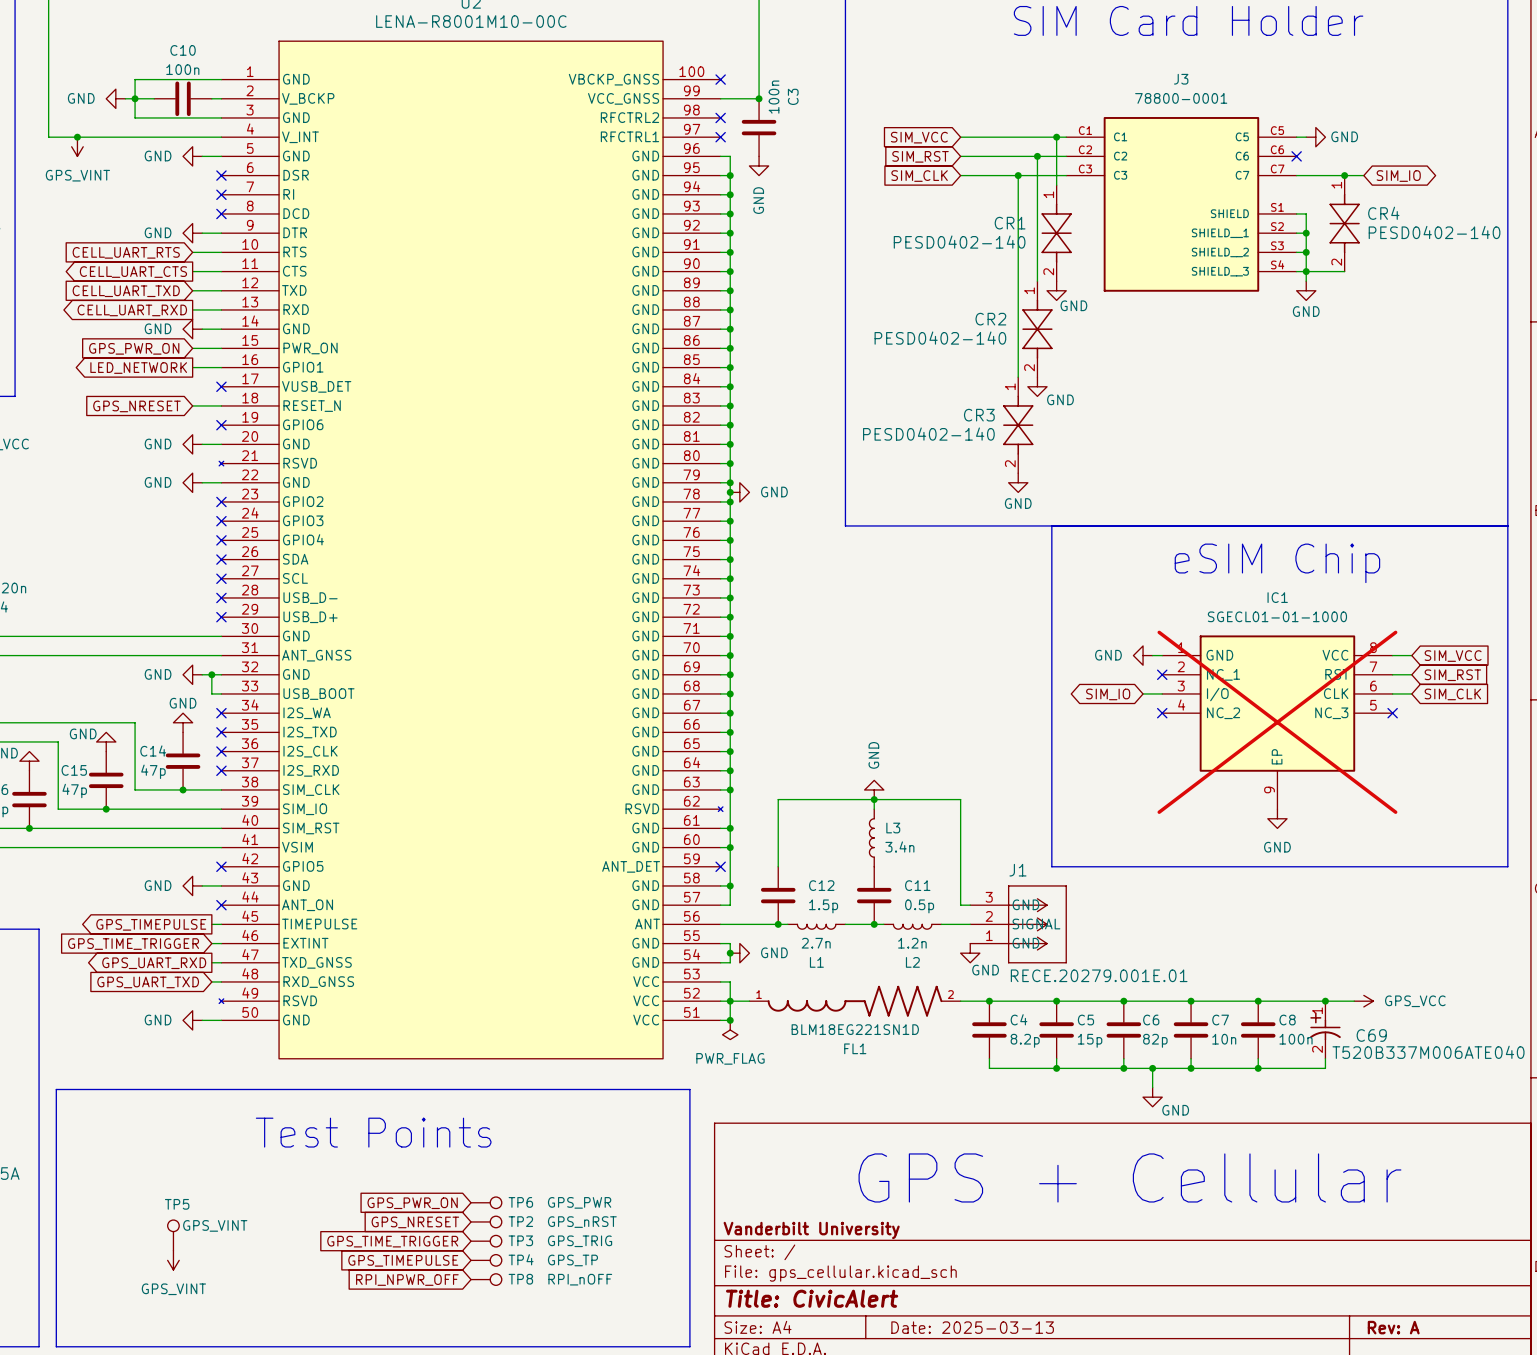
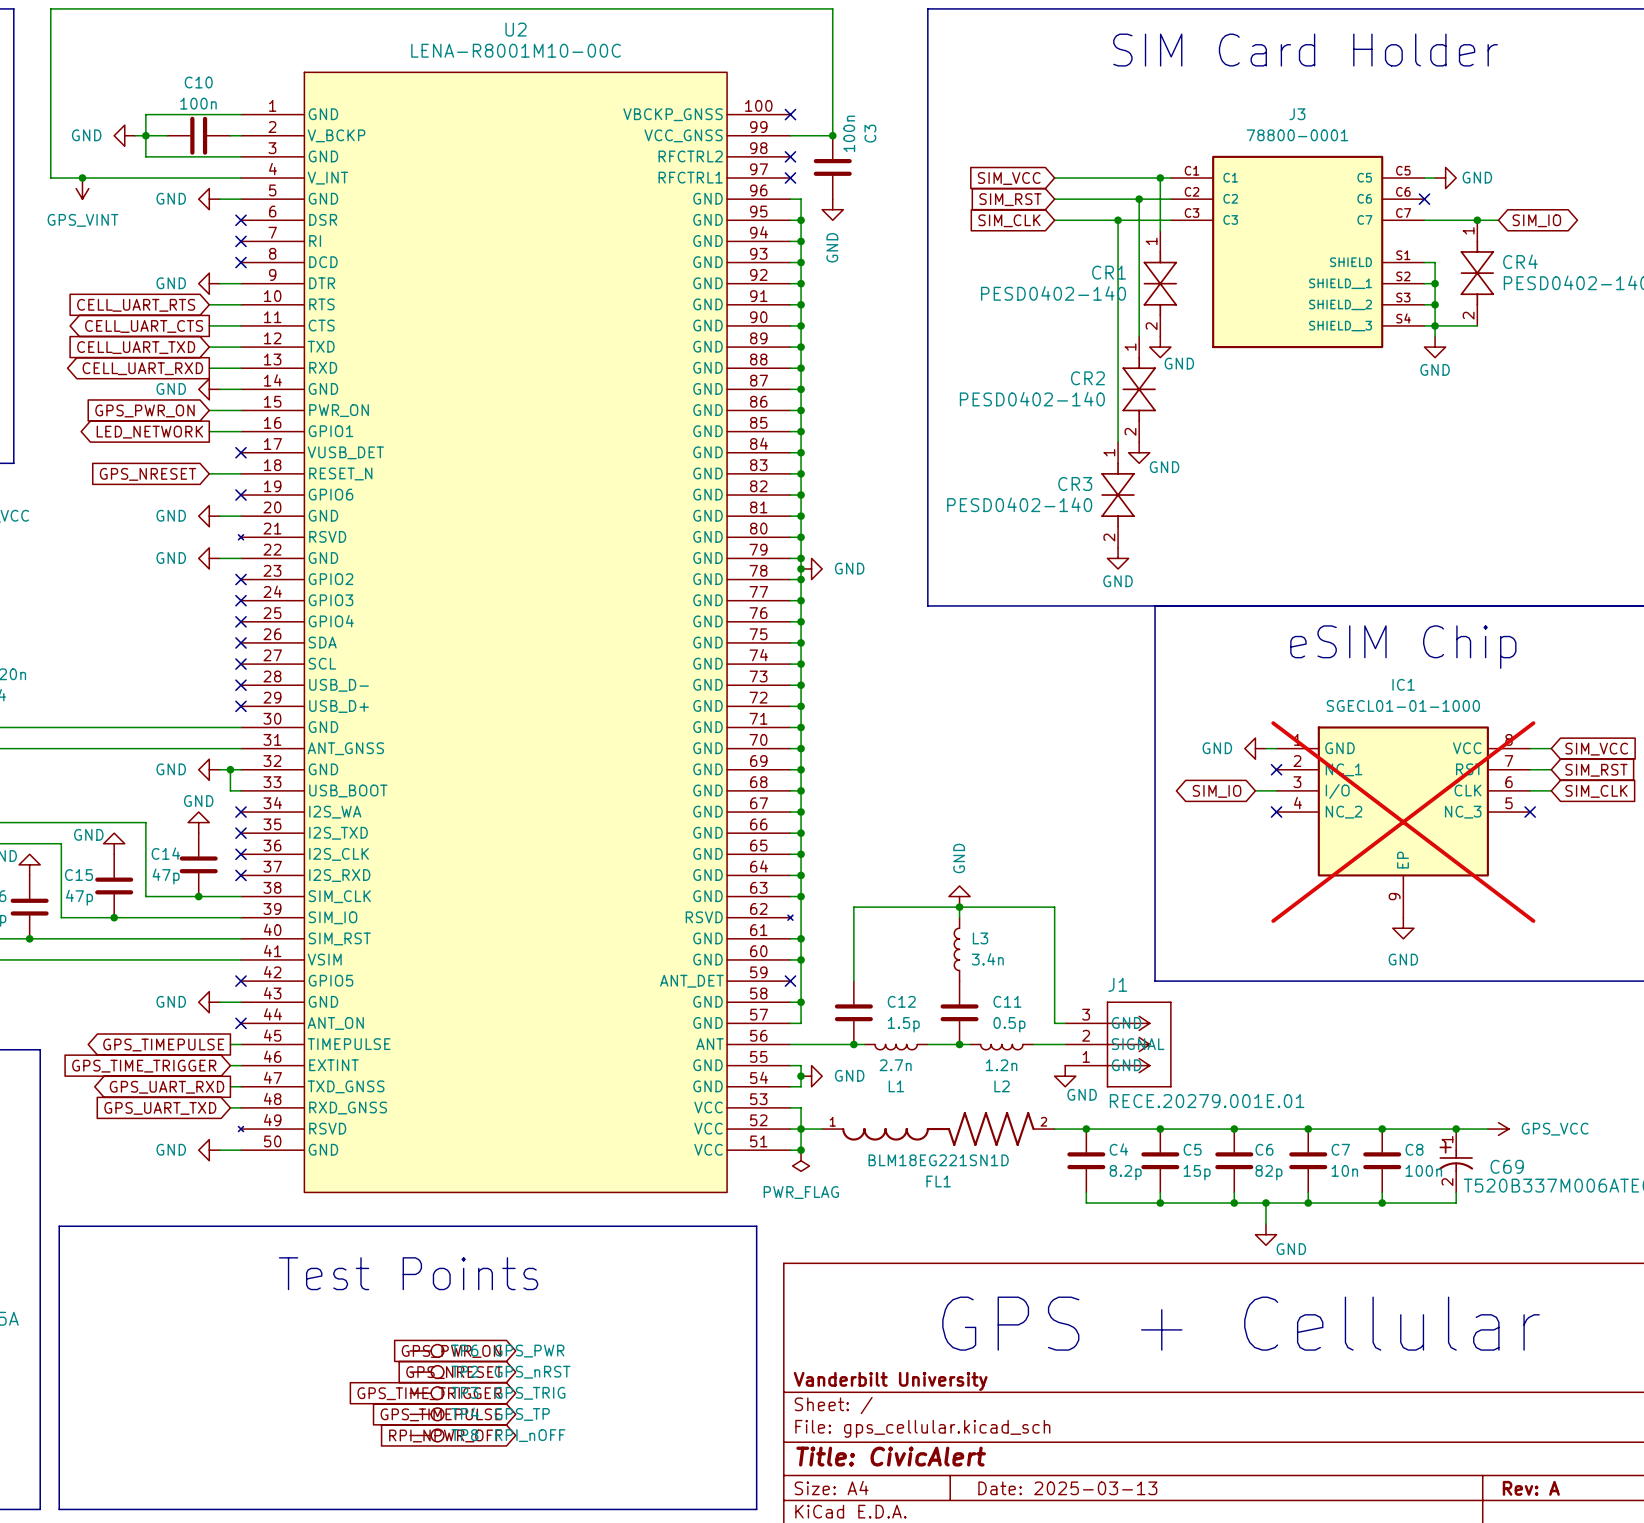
TP6 position: (486, 1202) -> (426, 1350)
TP2 position: (486, 1221) -> (426, 1372)
TP5: GPS_VINT (173, 1235) -> none
TP3 position: (486, 1241) -> (426, 1393)
power symbol: GPS_VINT (173, 1260) -> none
TP4 position: (486, 1260) -> (426, 1414)
TP8 position: (486, 1279) -> (426, 1435)

